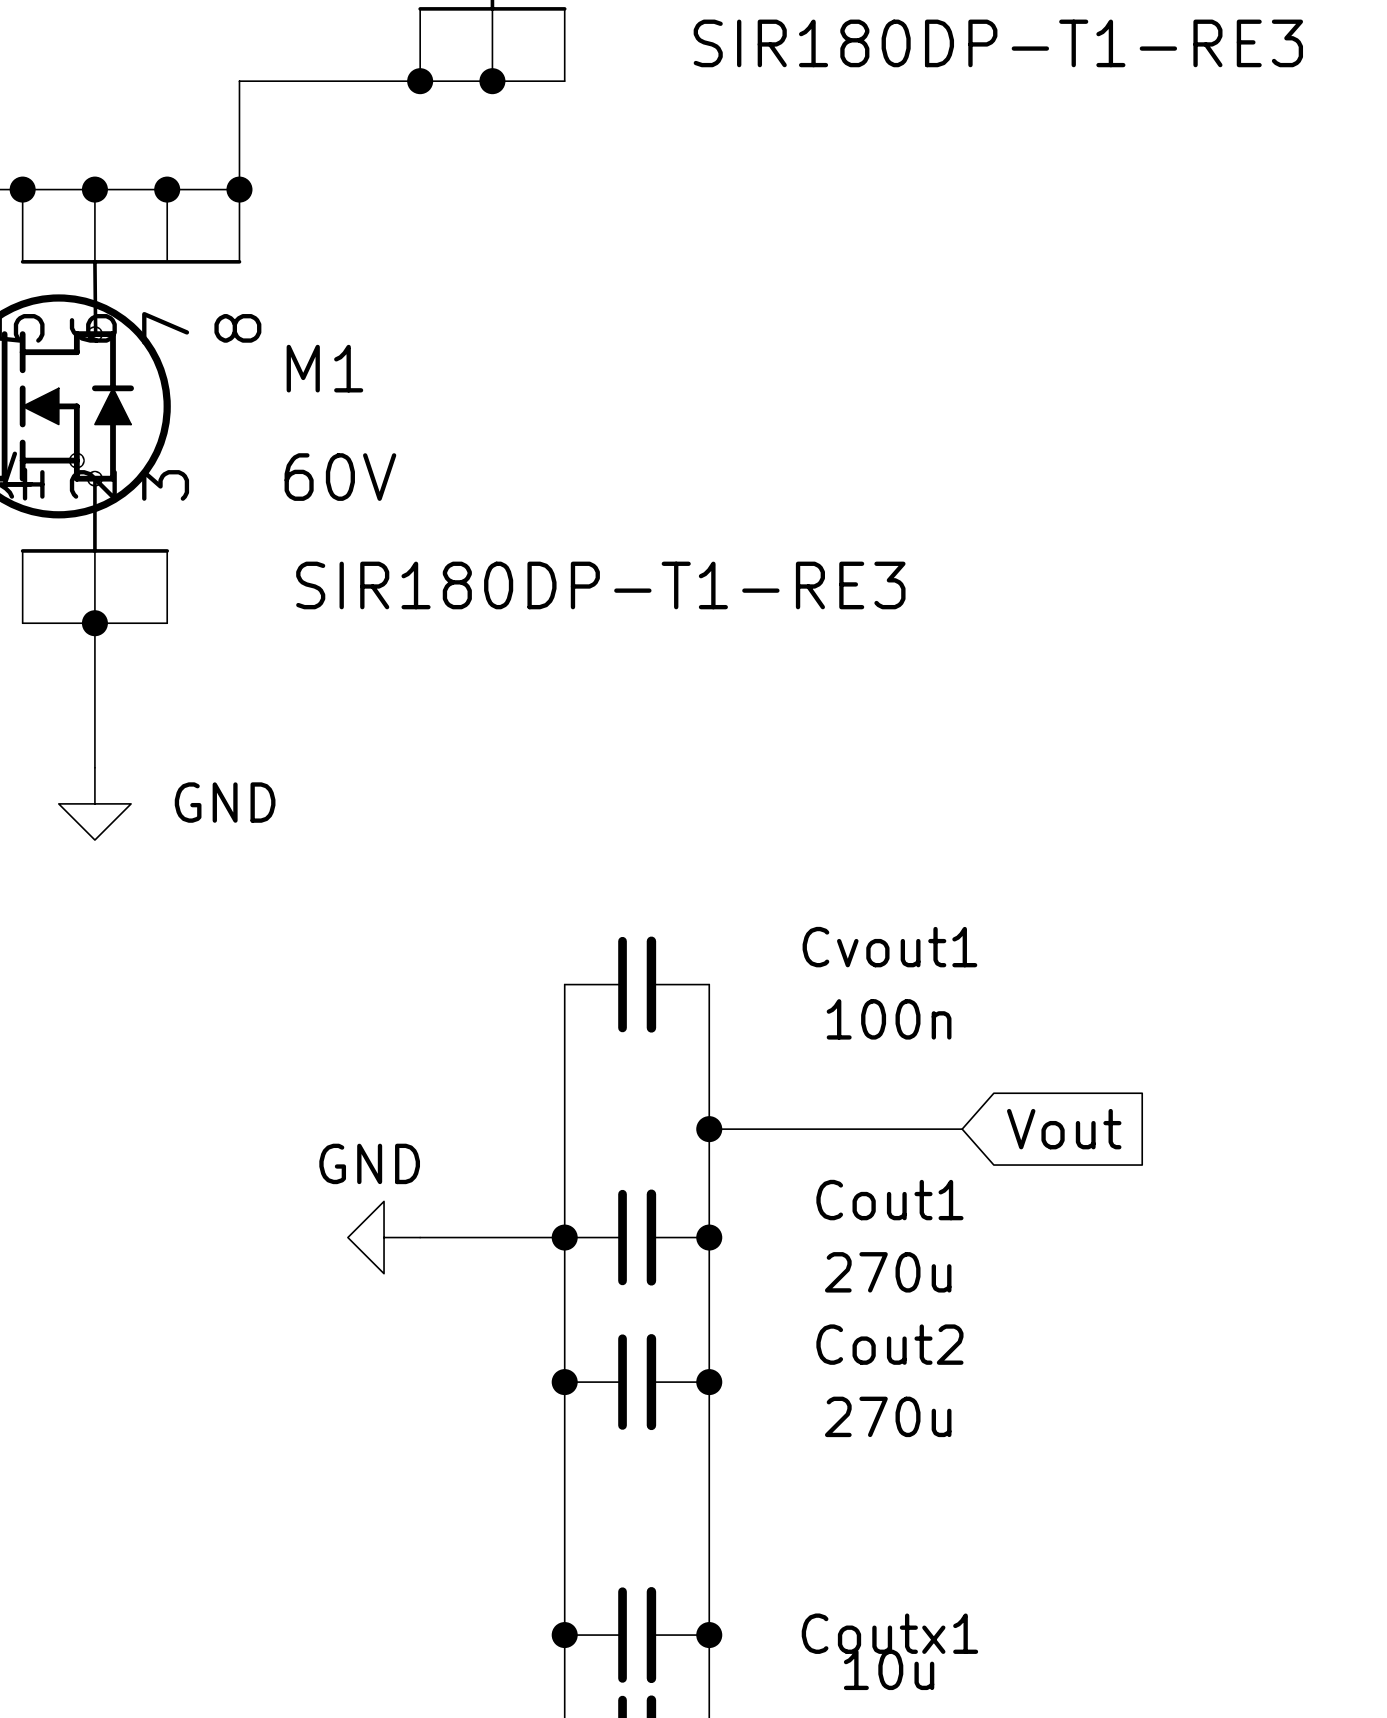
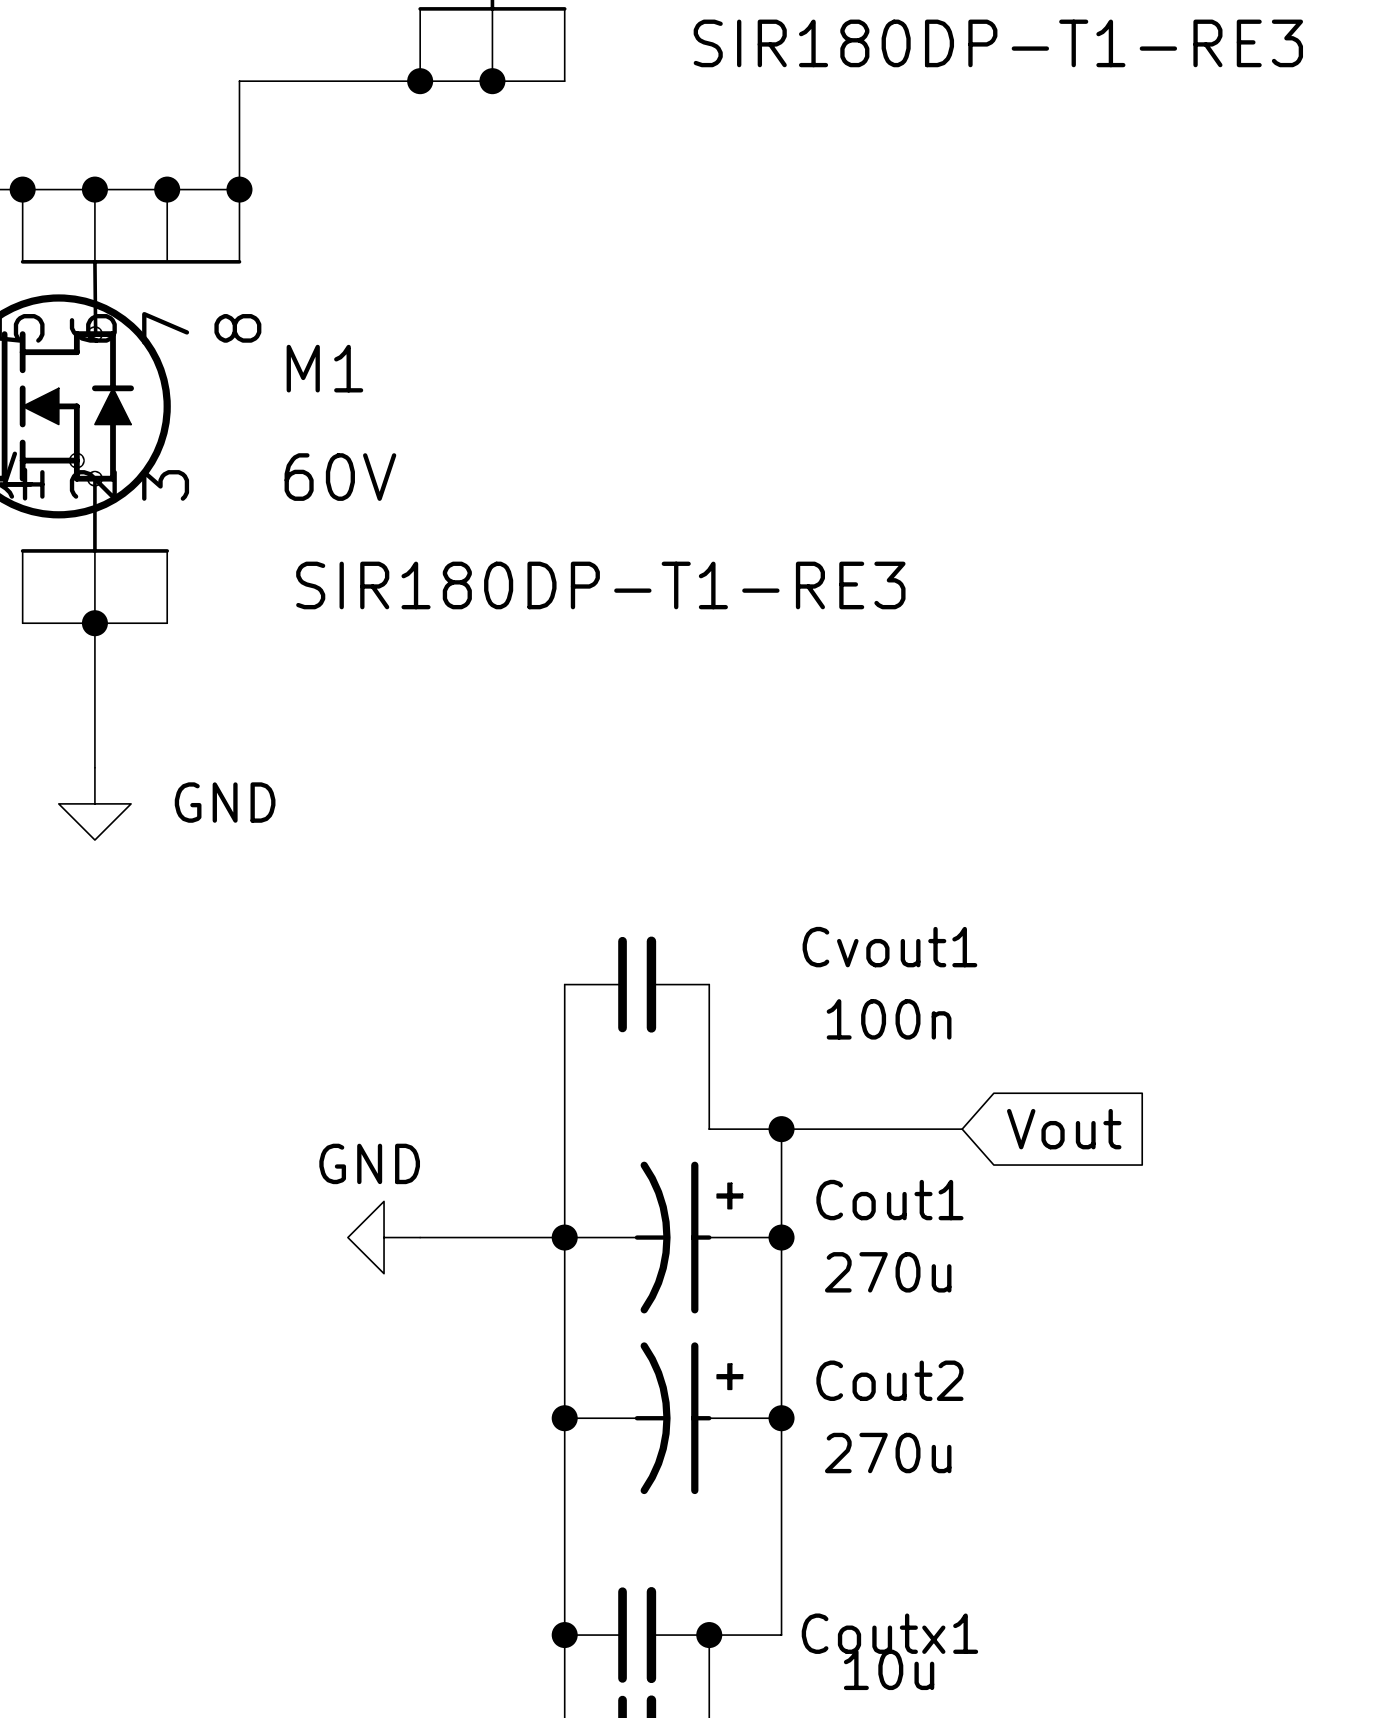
wire: (709, 1129) (709, 1635) -> (781, 1129) (781, 1635) (709, 1635)
junction: (709, 1129) -> none
junction: none -> (781, 1129)
Cout1 symbol: [564, 1189, 710, 1286] -> [564, 1161, 782, 1314]
junction: (709, 1237) -> none
junction: none -> (781, 1237)
Cout2 symbol: [564, 1334, 710, 1431] -> [564, 1342, 782, 1495]
junction position: (564, 1382) -> (564, 1418)
junction: (709, 1382) -> none
junction: none -> (781, 1418)

